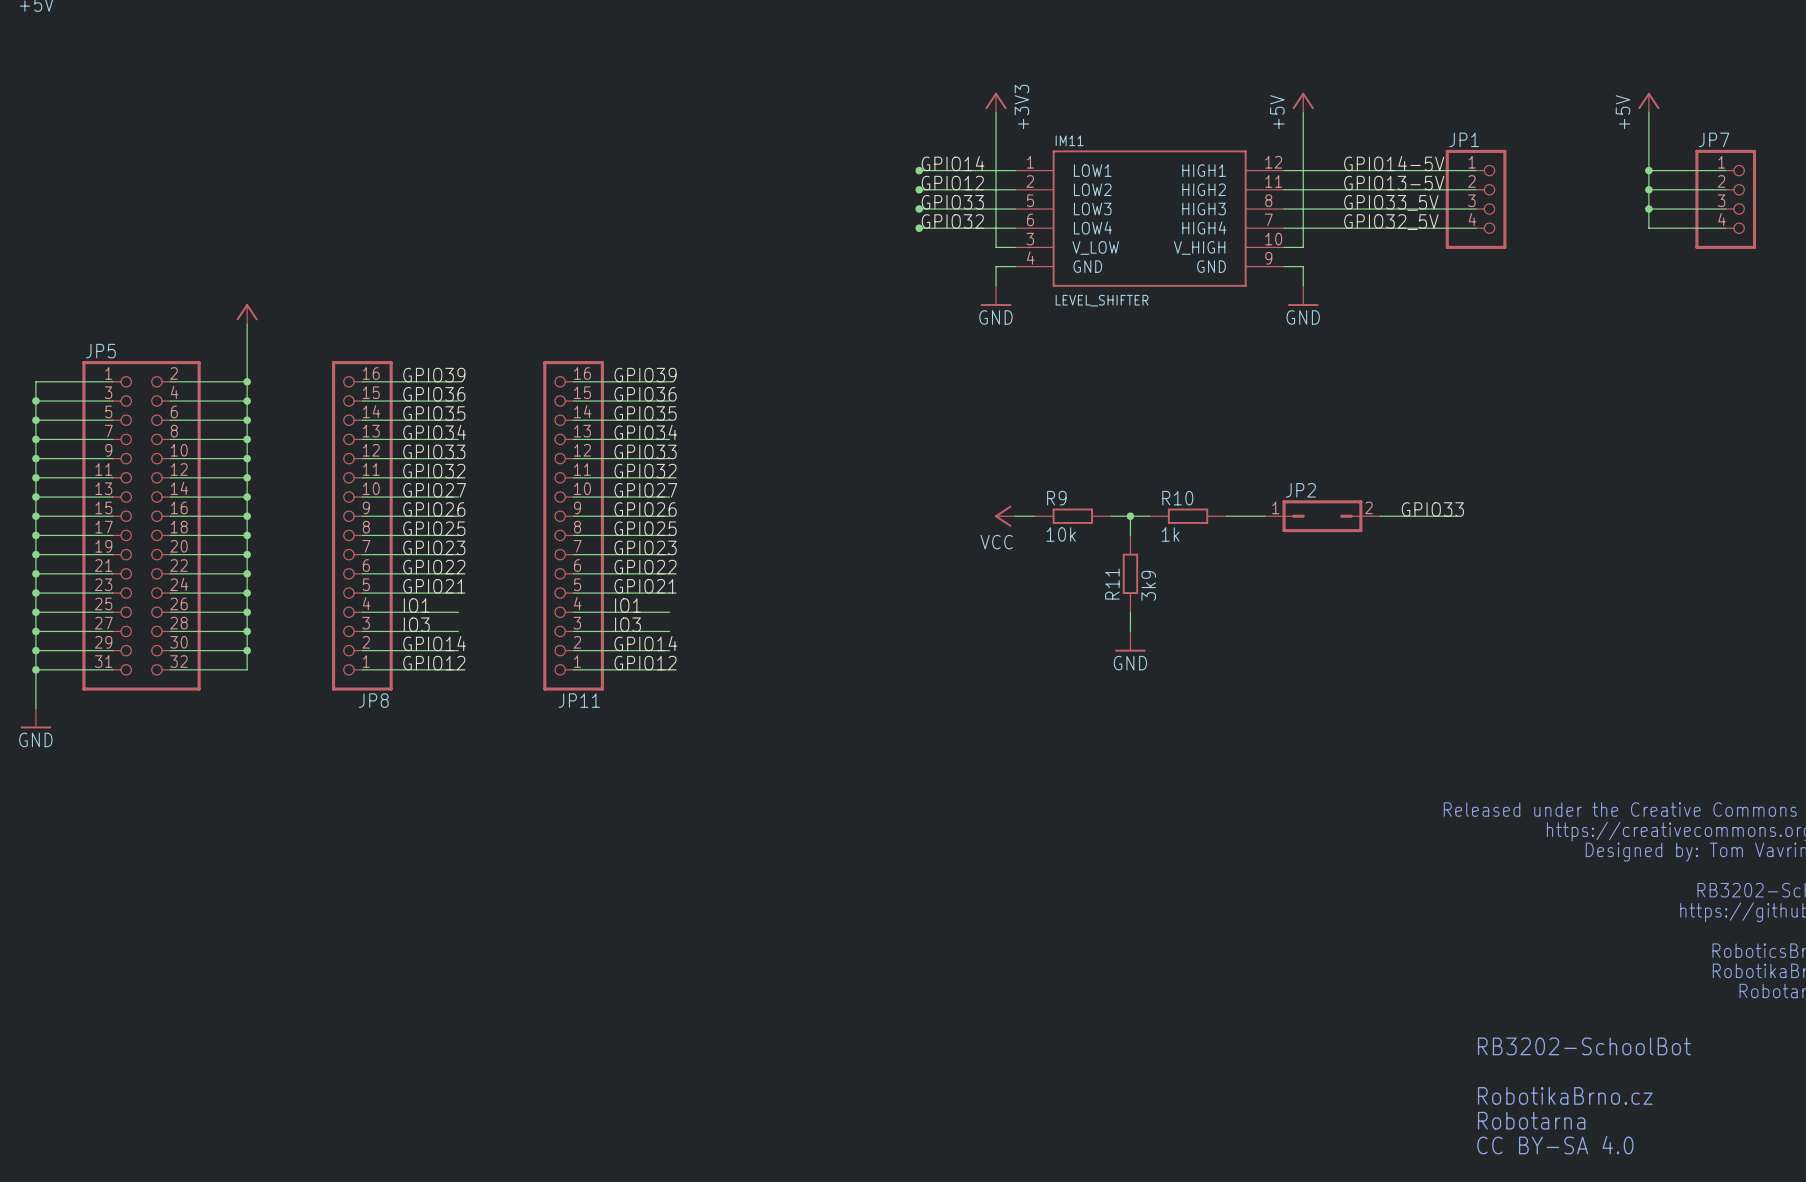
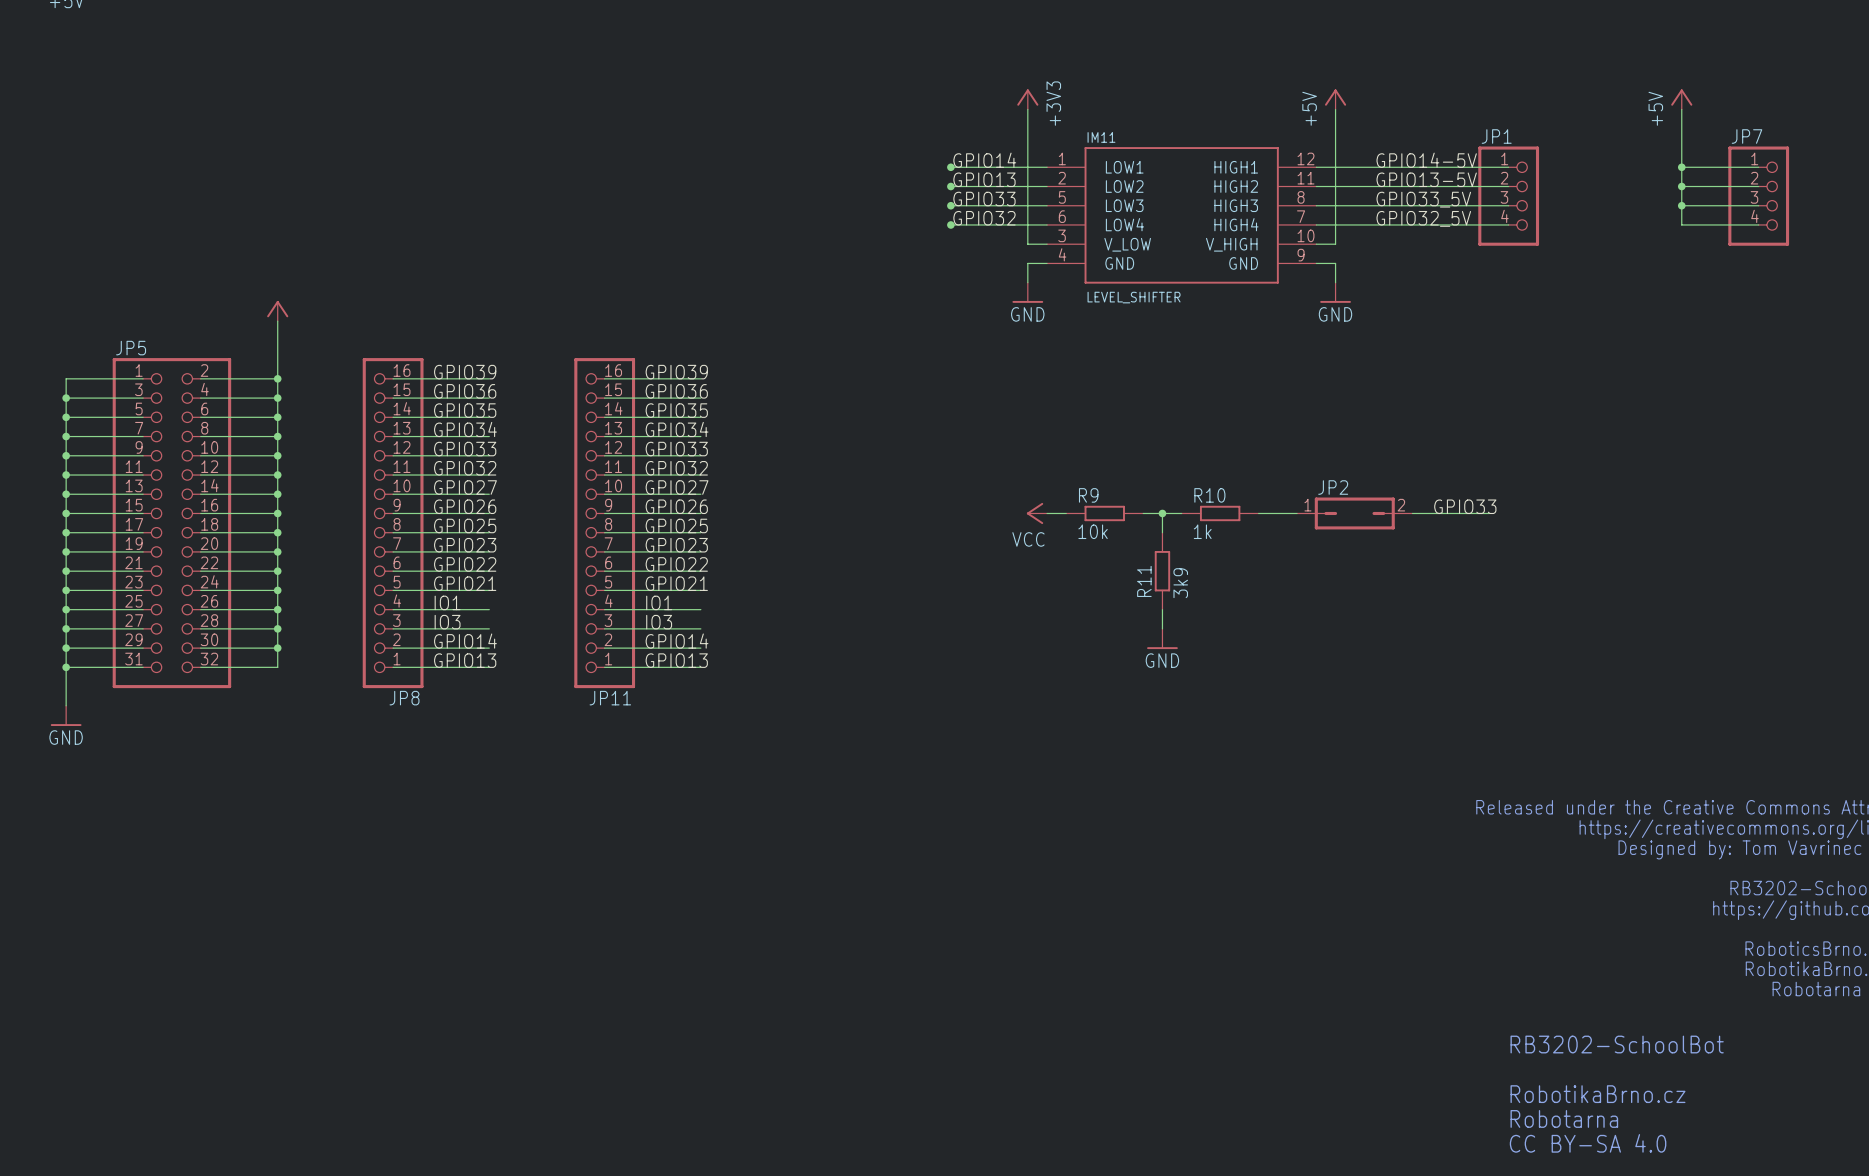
label: GPIO12 (952, 183) -> GPIO13 (984, 179)
label: GPIO12 (434, 663) -> GPIO13 (465, 660)
label: GPIO12 (645, 663) -> GPIO13 (676, 660)

